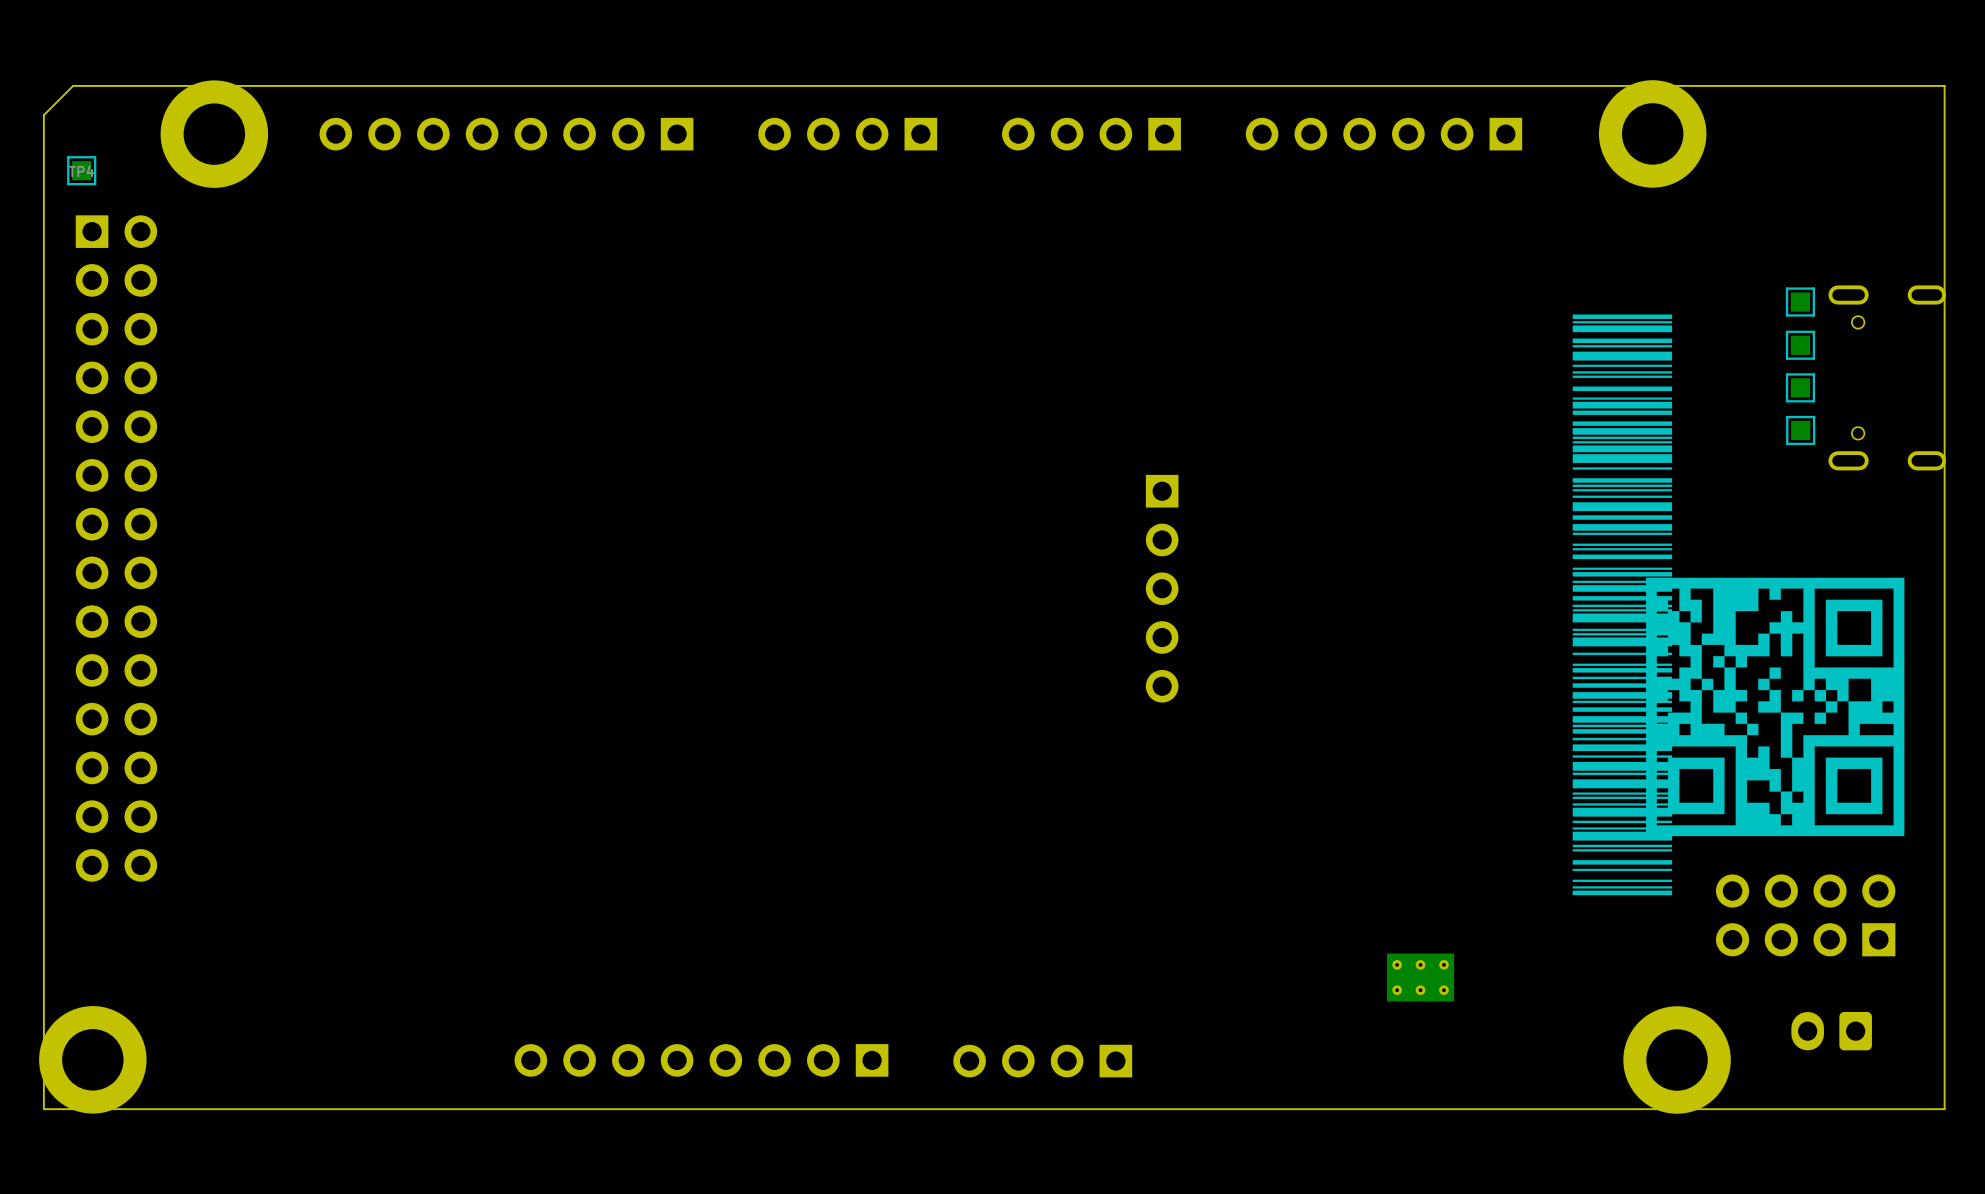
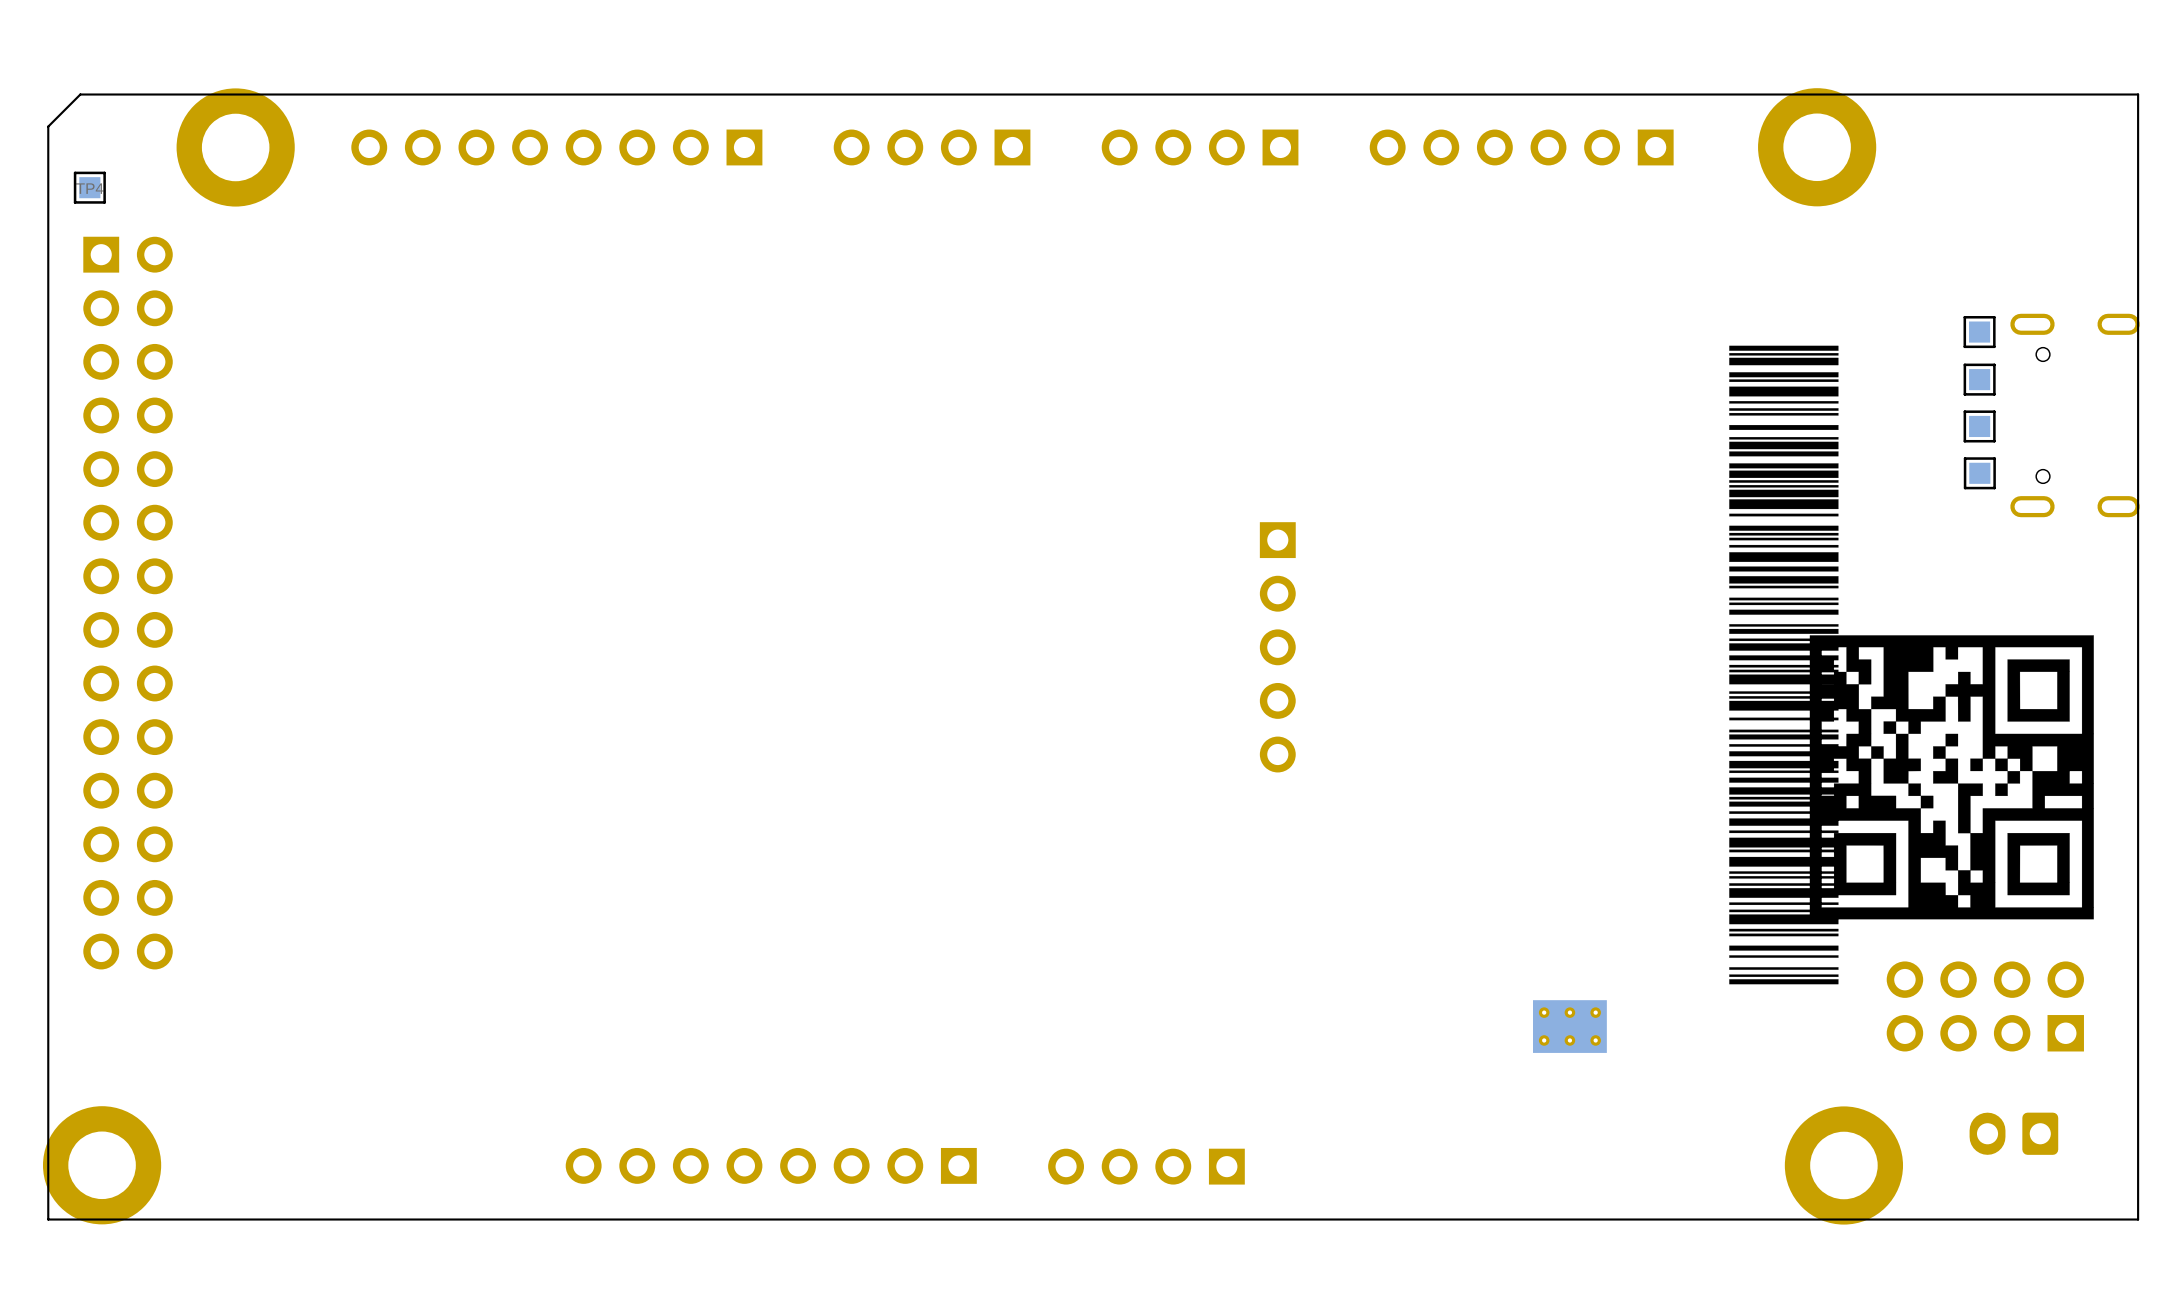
part position: (1420, 977) -> (1569, 1026)

